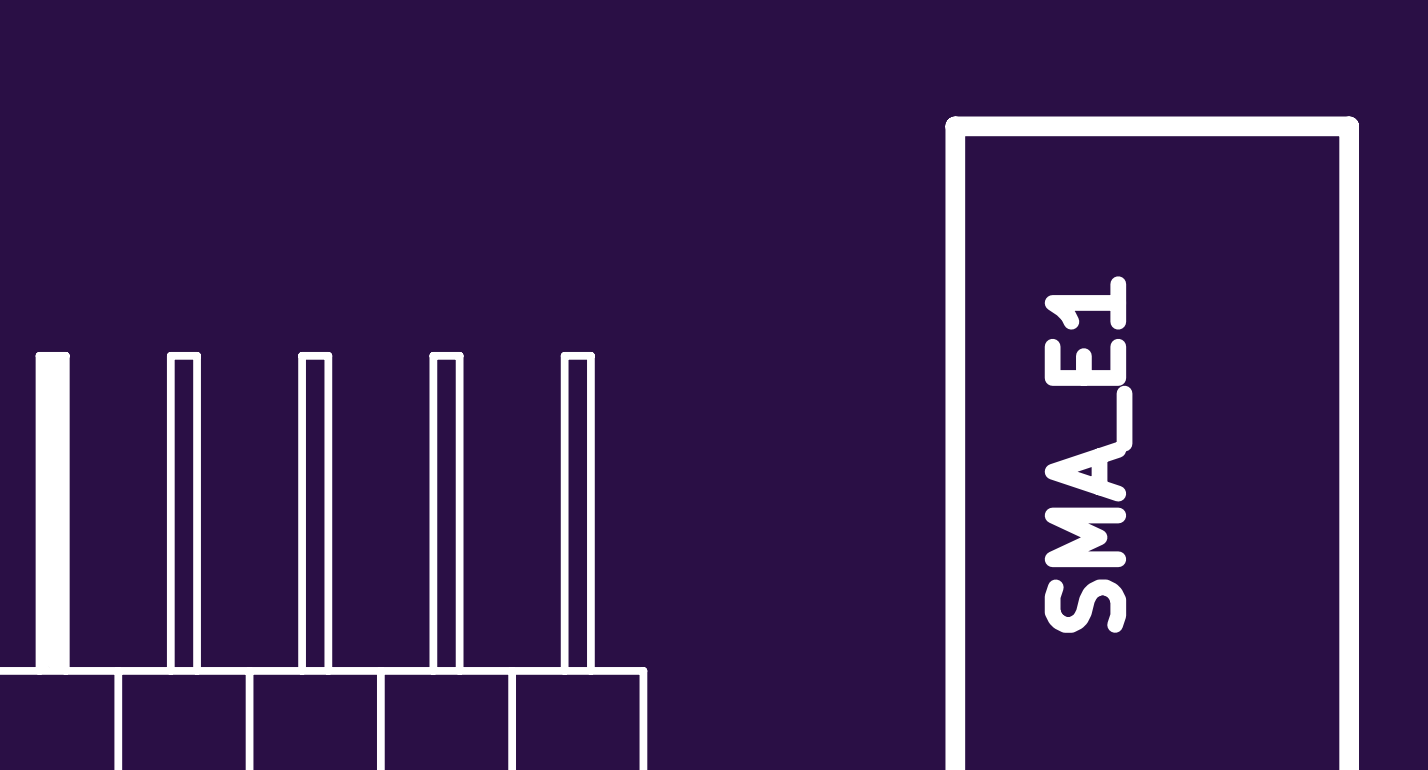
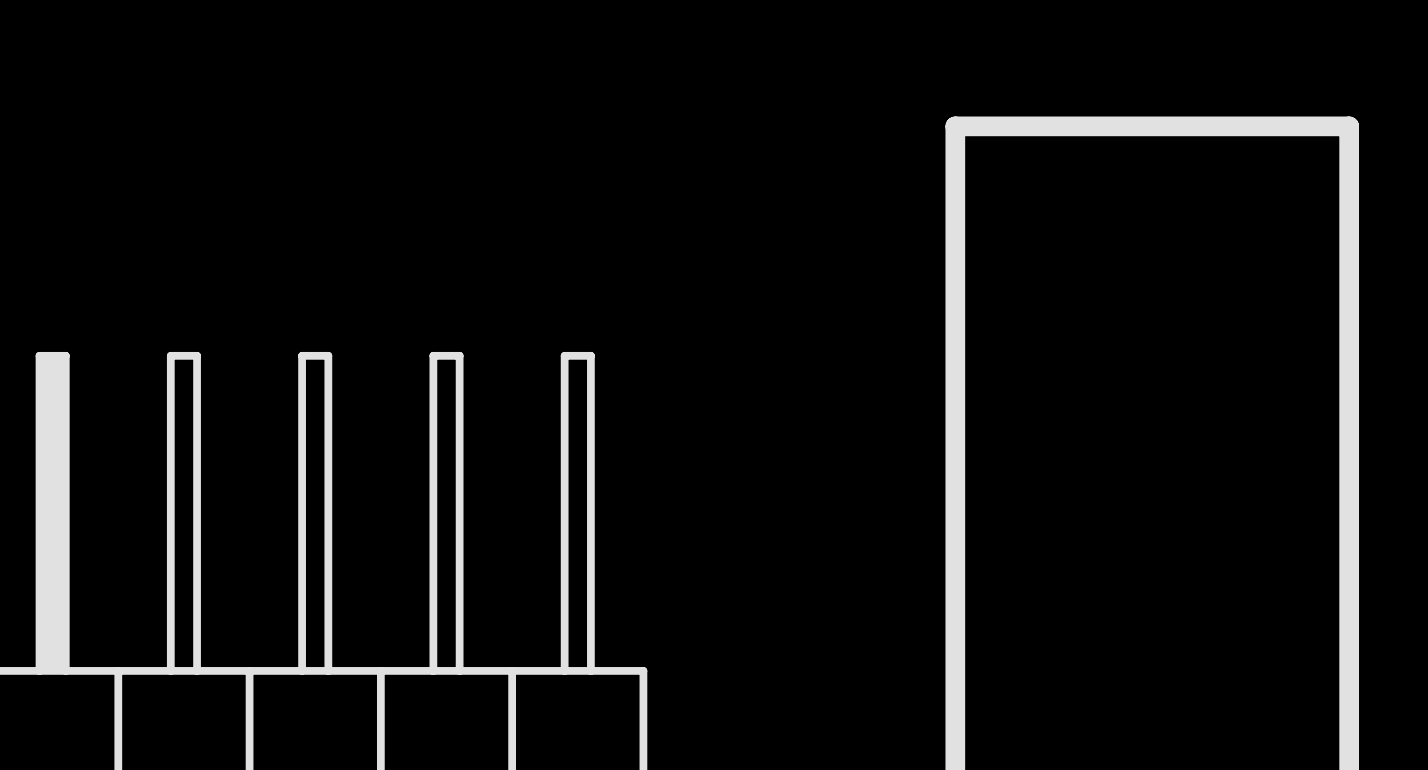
SMA_E1 name: SMA_E1 (1088, 454) -> none

